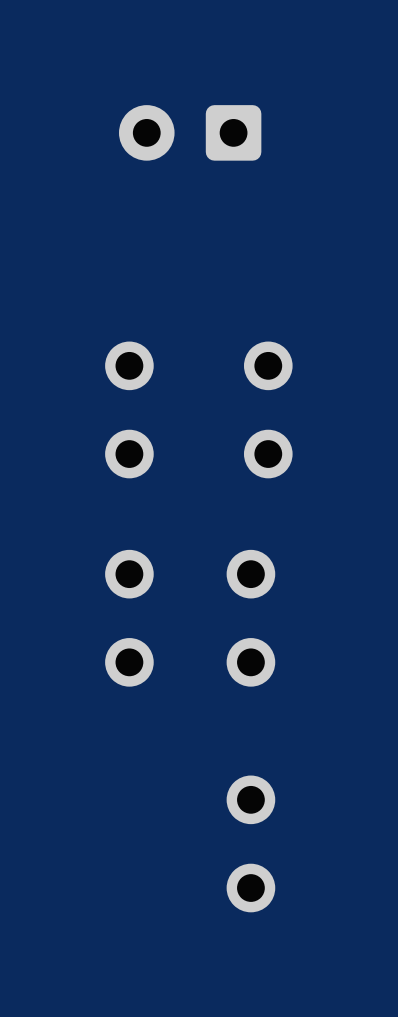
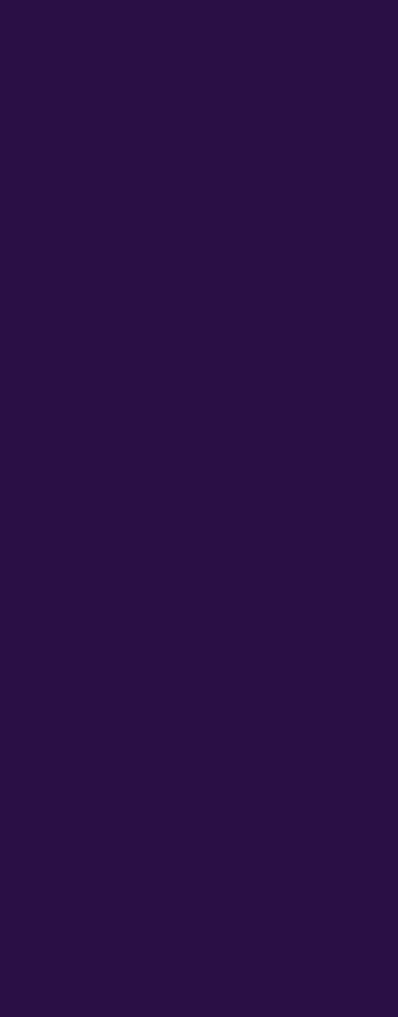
part: (190, 132) -> none
part: (129, 409) -> none
part: (268, 409) -> none
part: (129, 618) -> none
part: (250, 618) -> none
part: (250, 843) -> none

